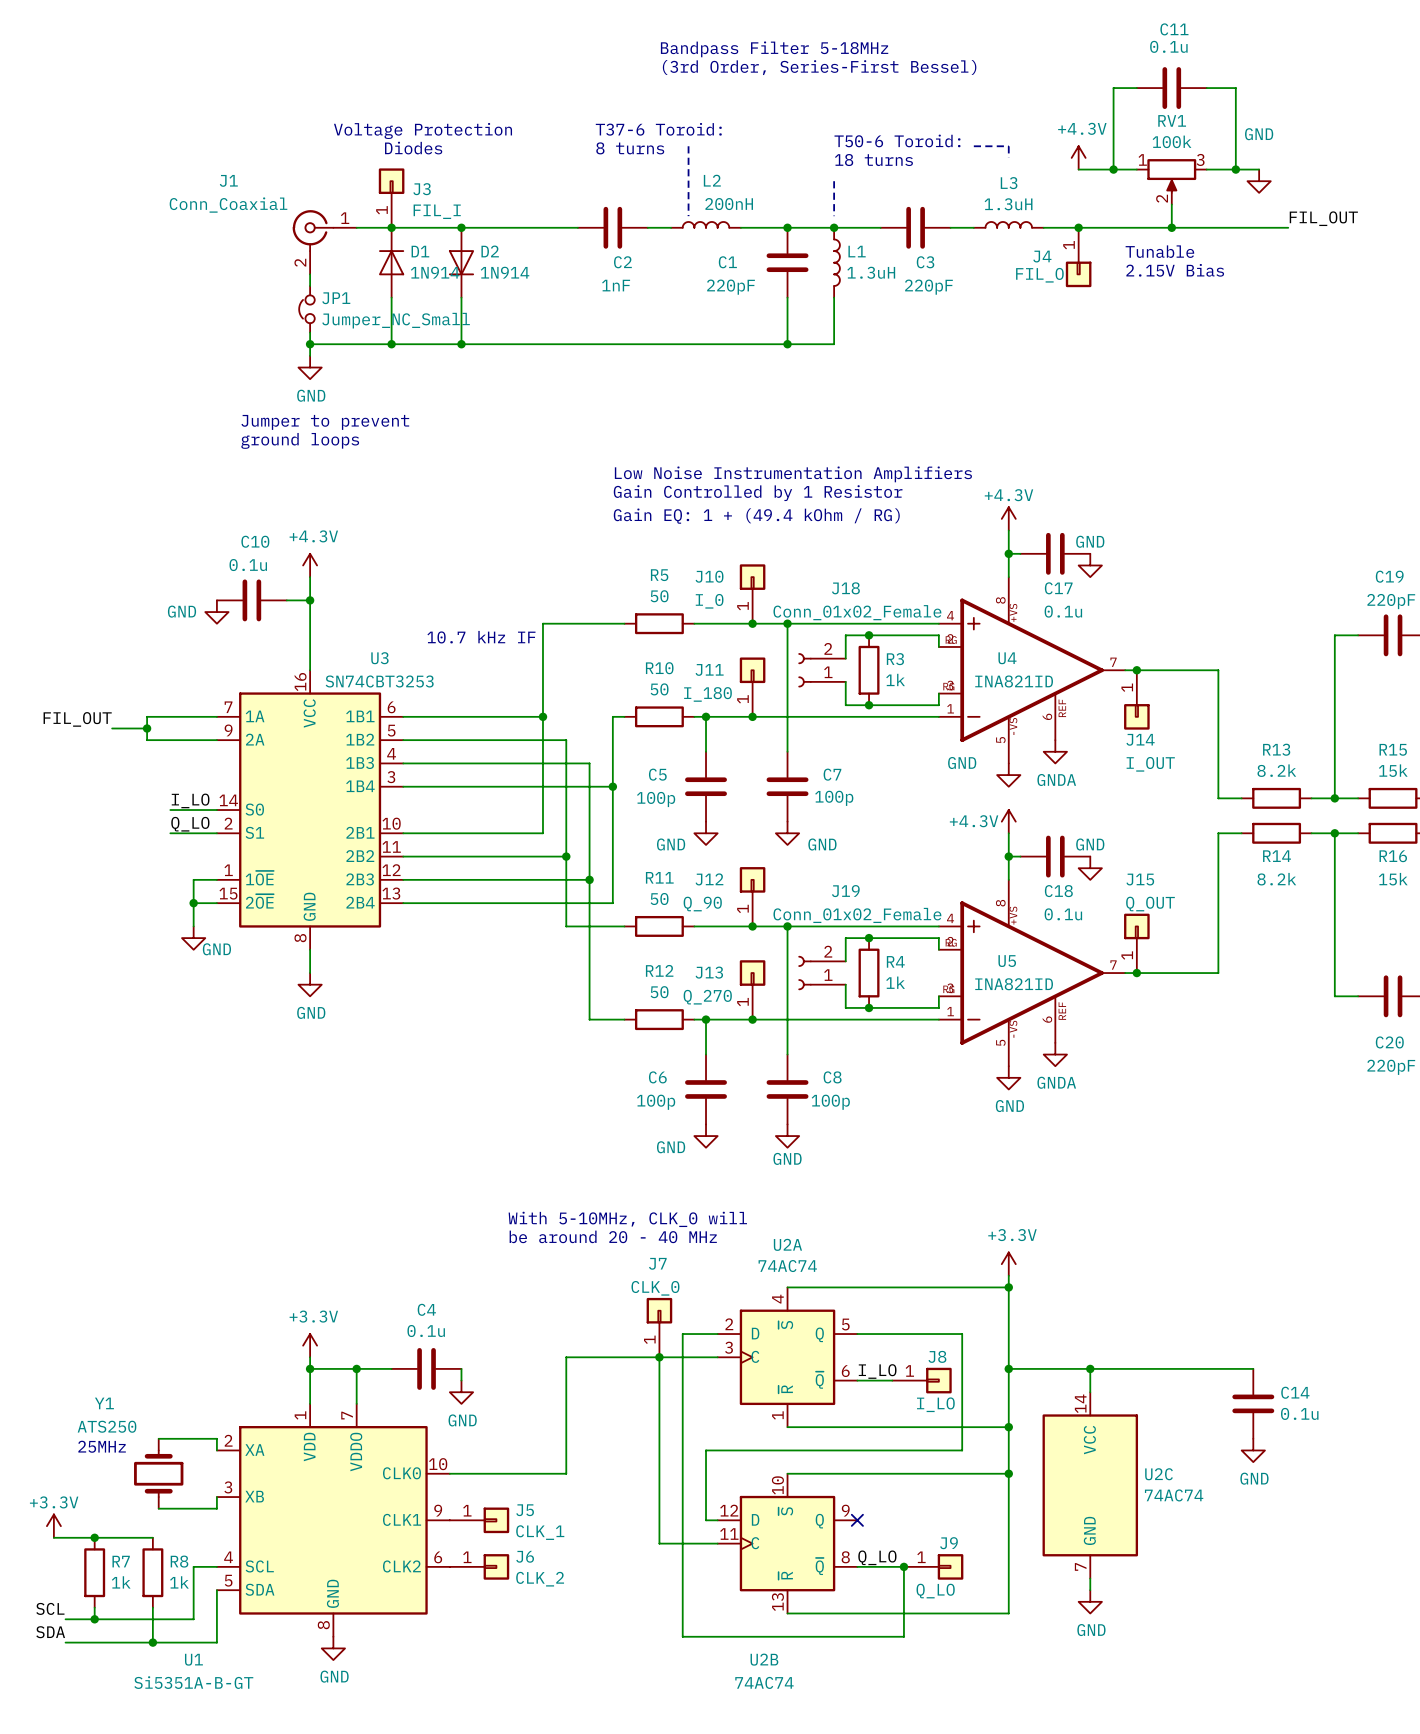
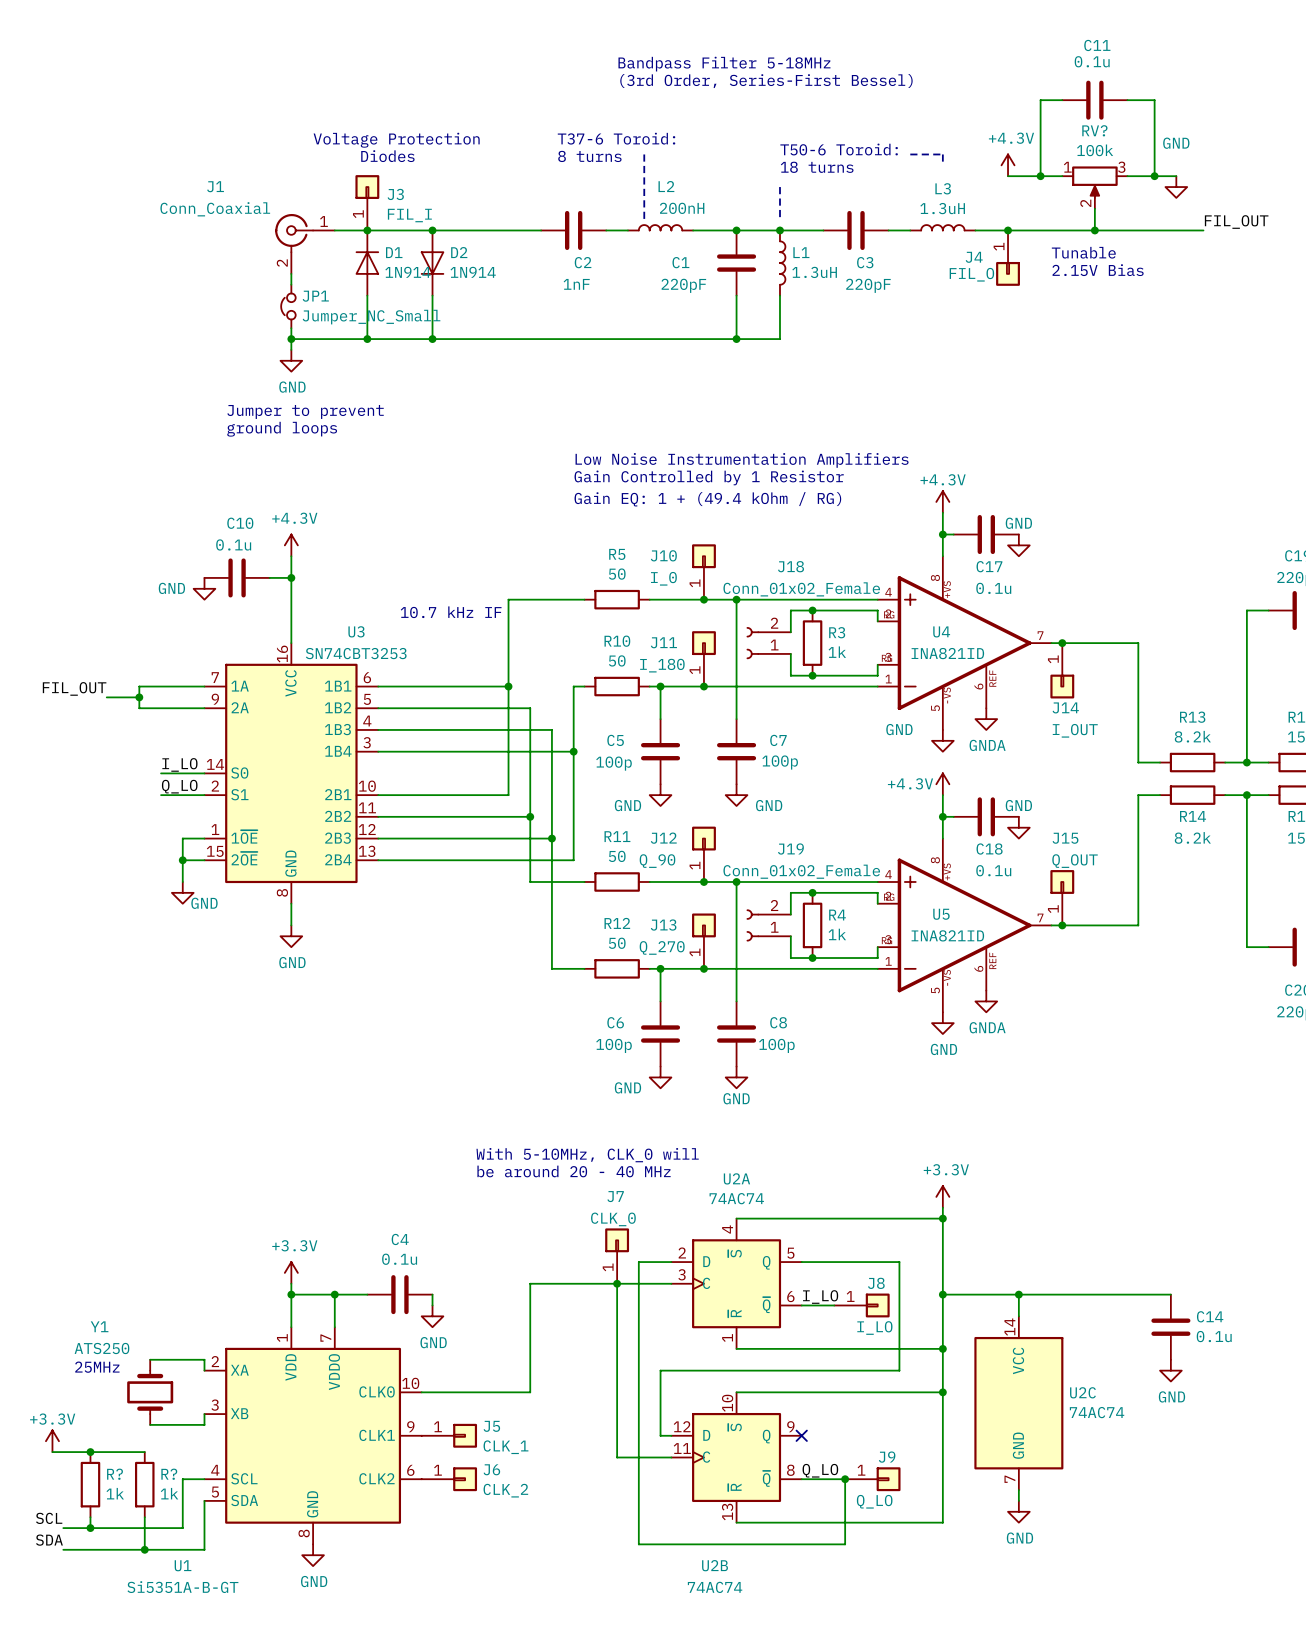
RV1 name: RV1 (1172, 120) -> RV? (1094, 130)
R7 name: R7 (121, 1561) -> R? (115, 1474)
R8 name: R8 (179, 1561) -> R? (169, 1474)

